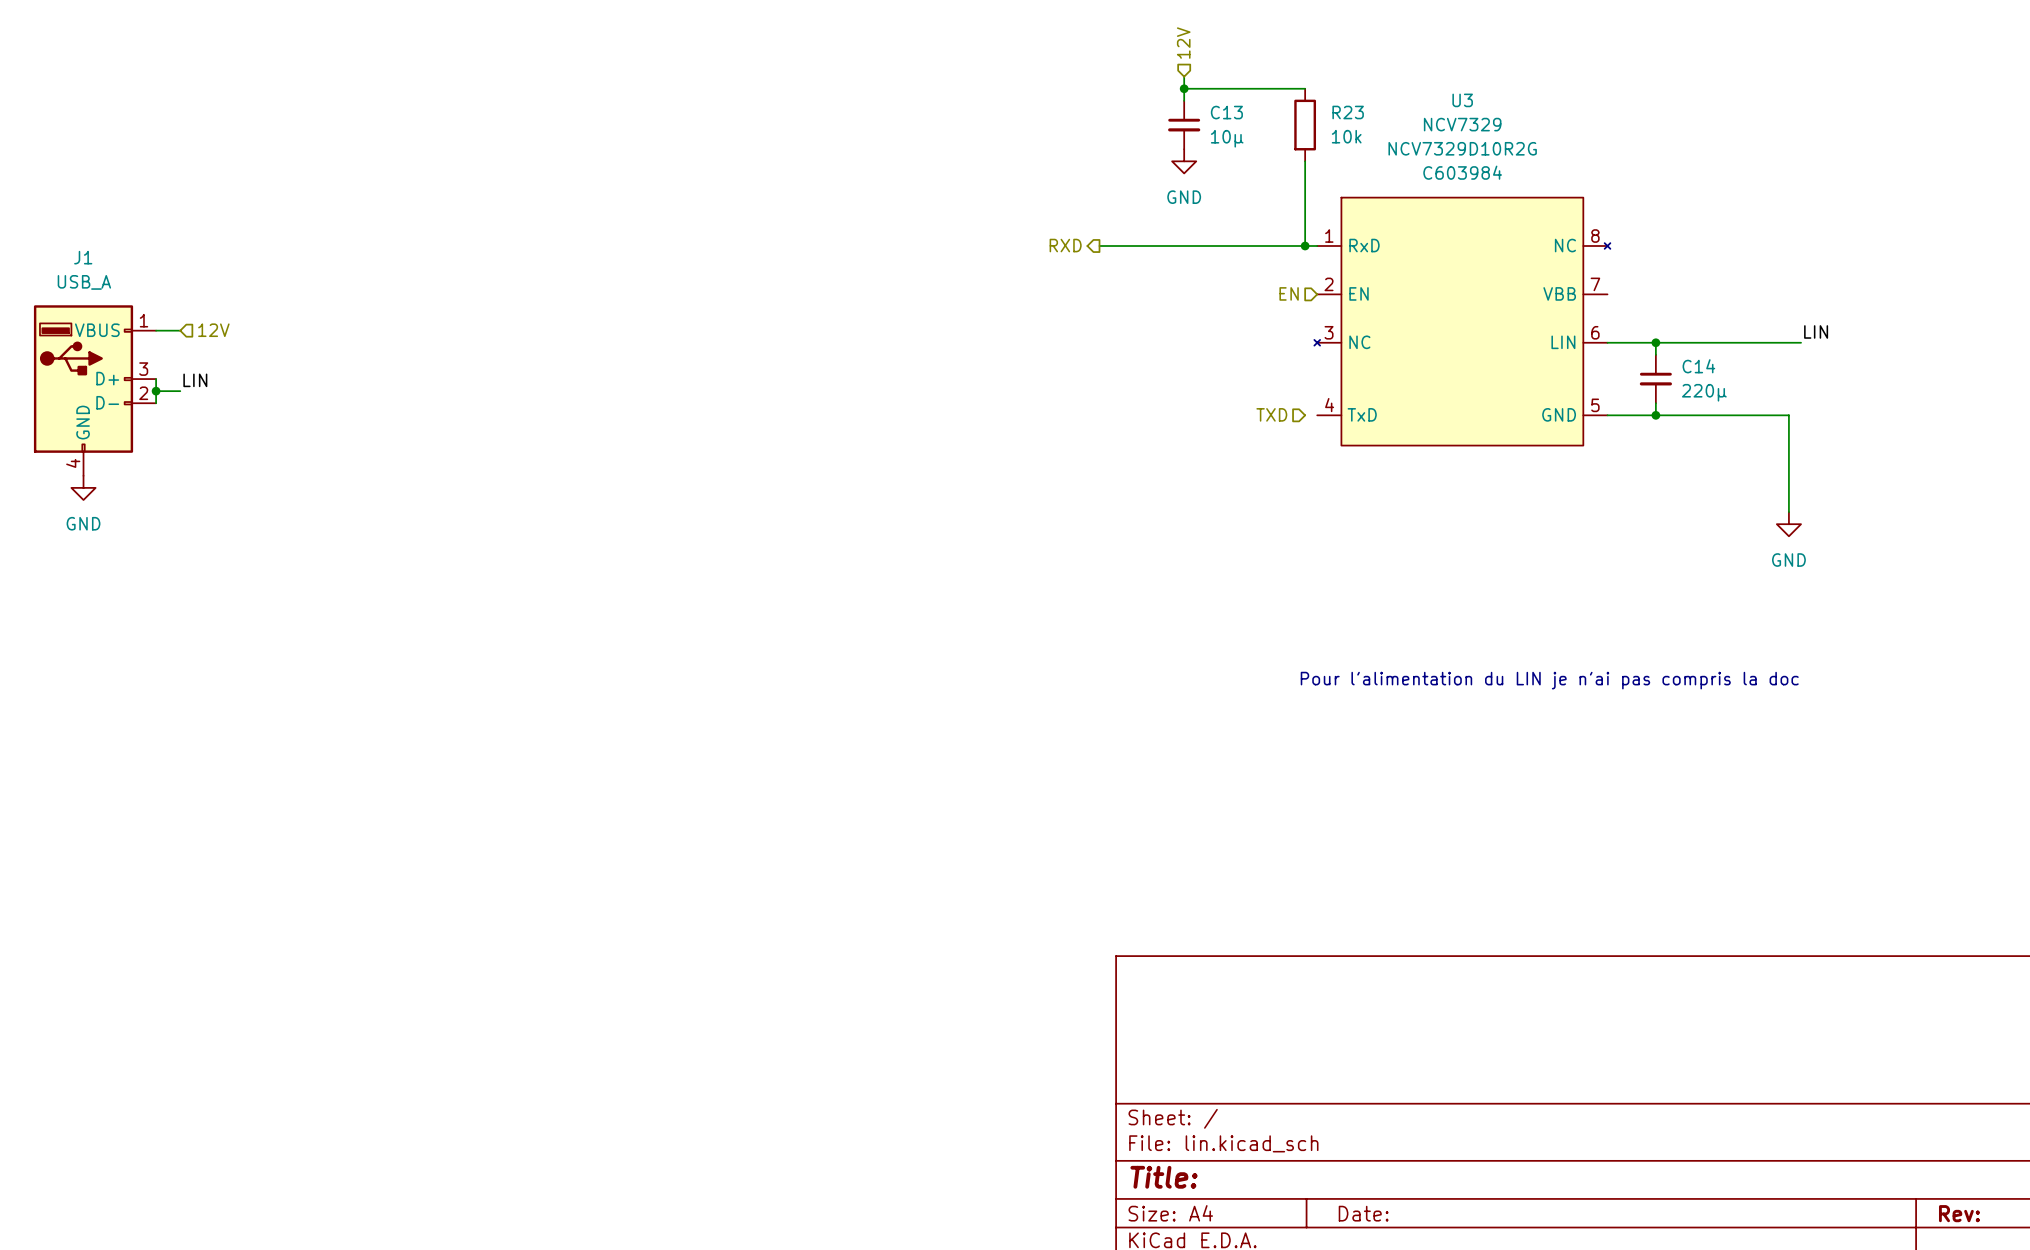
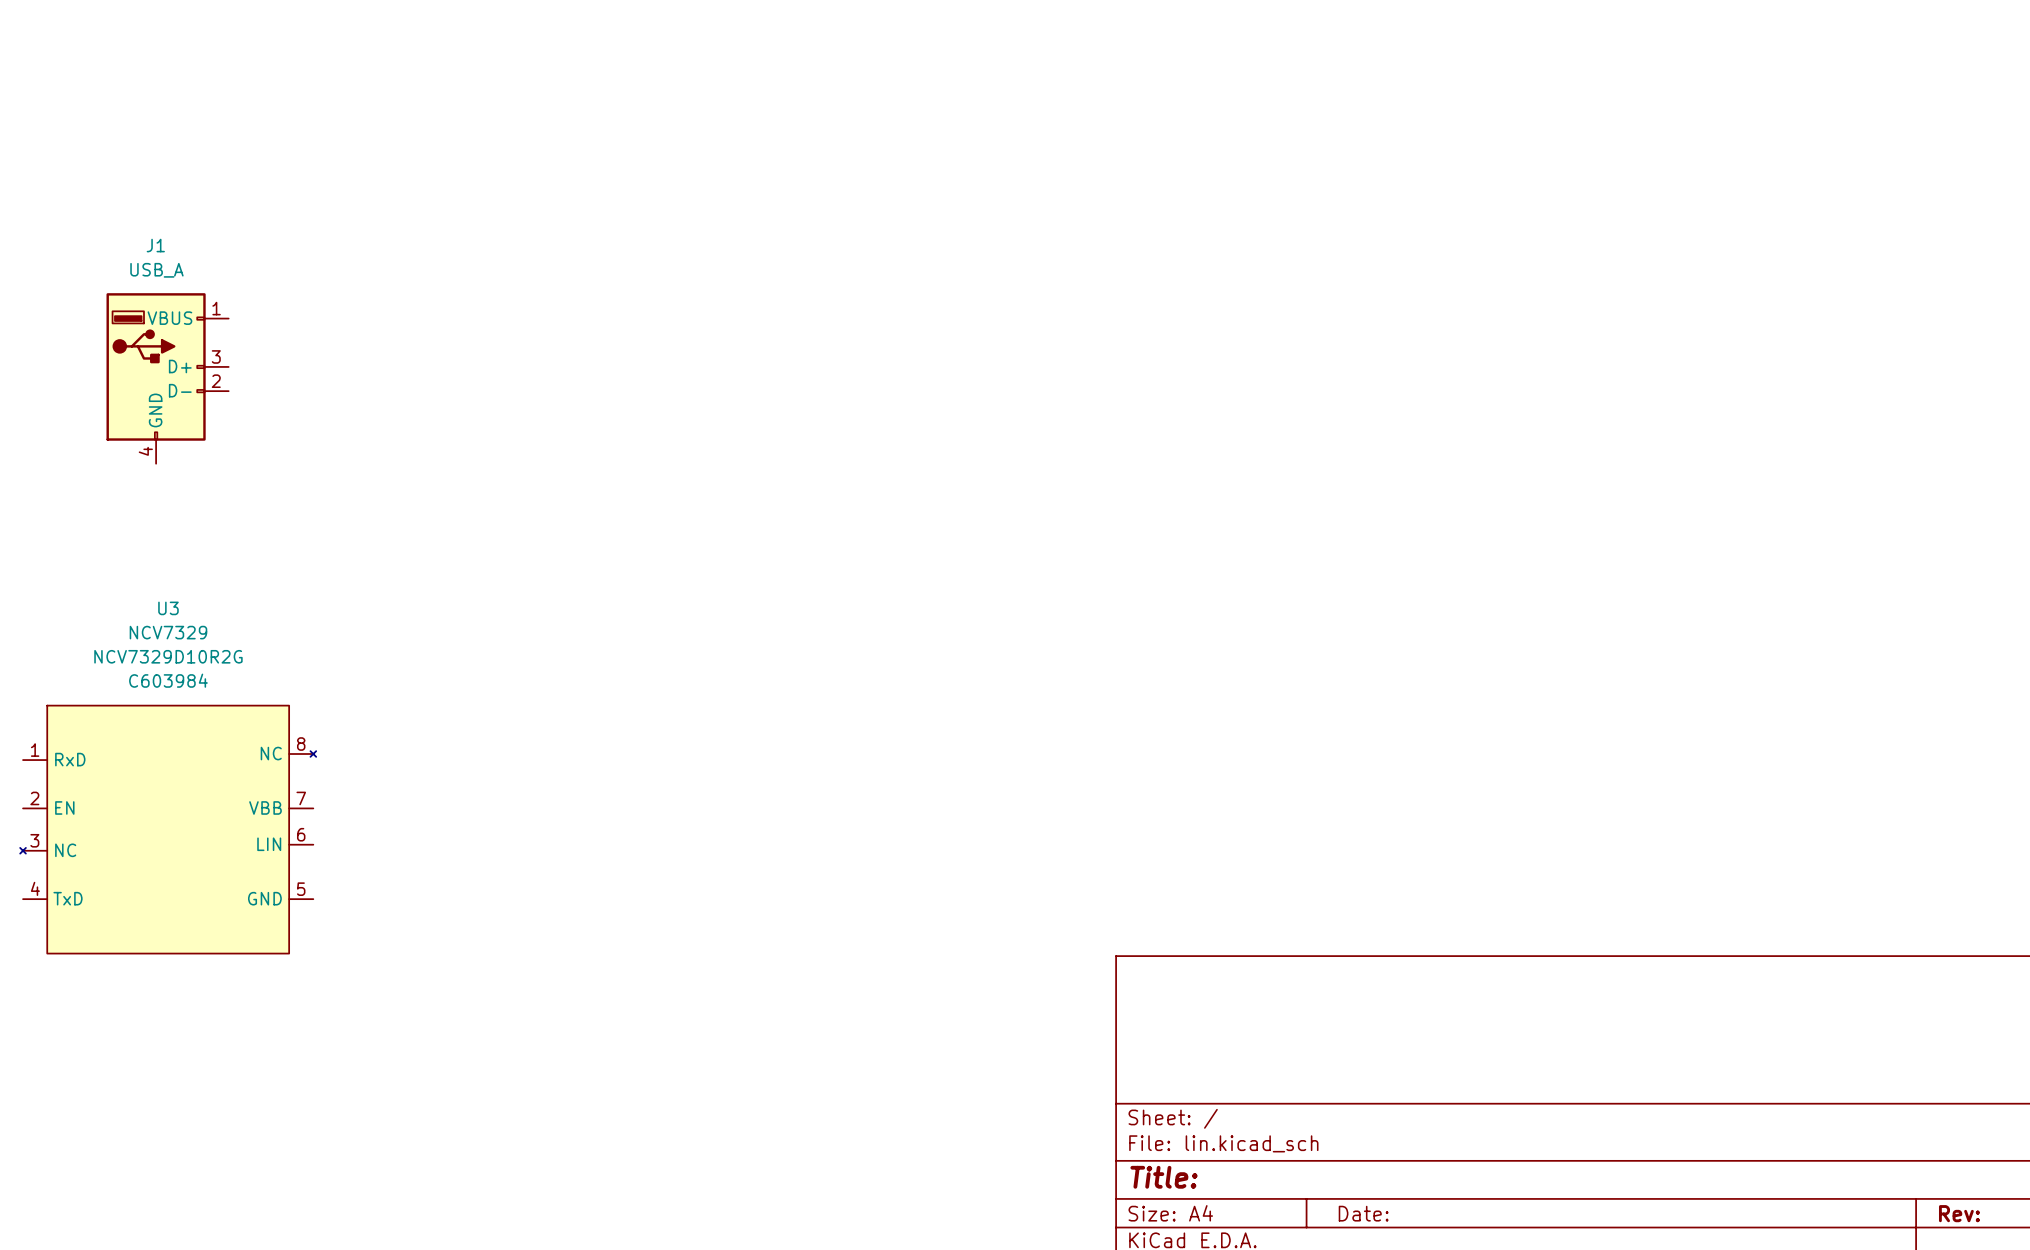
hierarchical label: 12V (1183, 43) -> none
wire: (1184, 76) (1184, 100) -> none
wire: (1184, 88) (1305, 88) -> none
junction: (1184, 88) -> none
C13: 10µ (1184, 125) -> none
R23: 10k (1305, 125) -> none
power symbol: GND (1184, 161) -> none
wire: (1305, 161) (1305, 246) -> none
U3 symbol: [1314, 197, 1611, 446] -> [20, 705, 317, 954]
hierarchical label: RXD (1065, 245) -> none
wire: (1099, 246) (1317, 246) -> none
junction: (1305, 246) -> none
hierarchical label: EN (1289, 293) -> none
hierarchical label: 12V (213, 330) -> none
label: LIN (1816, 331) -> none
wire: (1607, 342) (1801, 342) -> none
wire: (1655, 342) (1655, 354) -> none
junction: (1655, 342) -> none
C14: 220µ (1655, 379) -> none
label: LIN (195, 380) -> none
J1 position: (95, 390) -> (167, 378)
junction: (156, 391) -> none
wire: (1655, 403) (1655, 415) -> none
hierarchical label: TXD (1271, 414) -> none
wire: (1607, 415) (1788, 415) (1788, 512) -> none
junction: (1655, 415) -> none
power symbol: GND (83, 487) -> none
power symbol: GND (1788, 524) -> none
text: Pour l'alimentation du LIN je n'ai pas compris la doc (1549, 680) -> none

